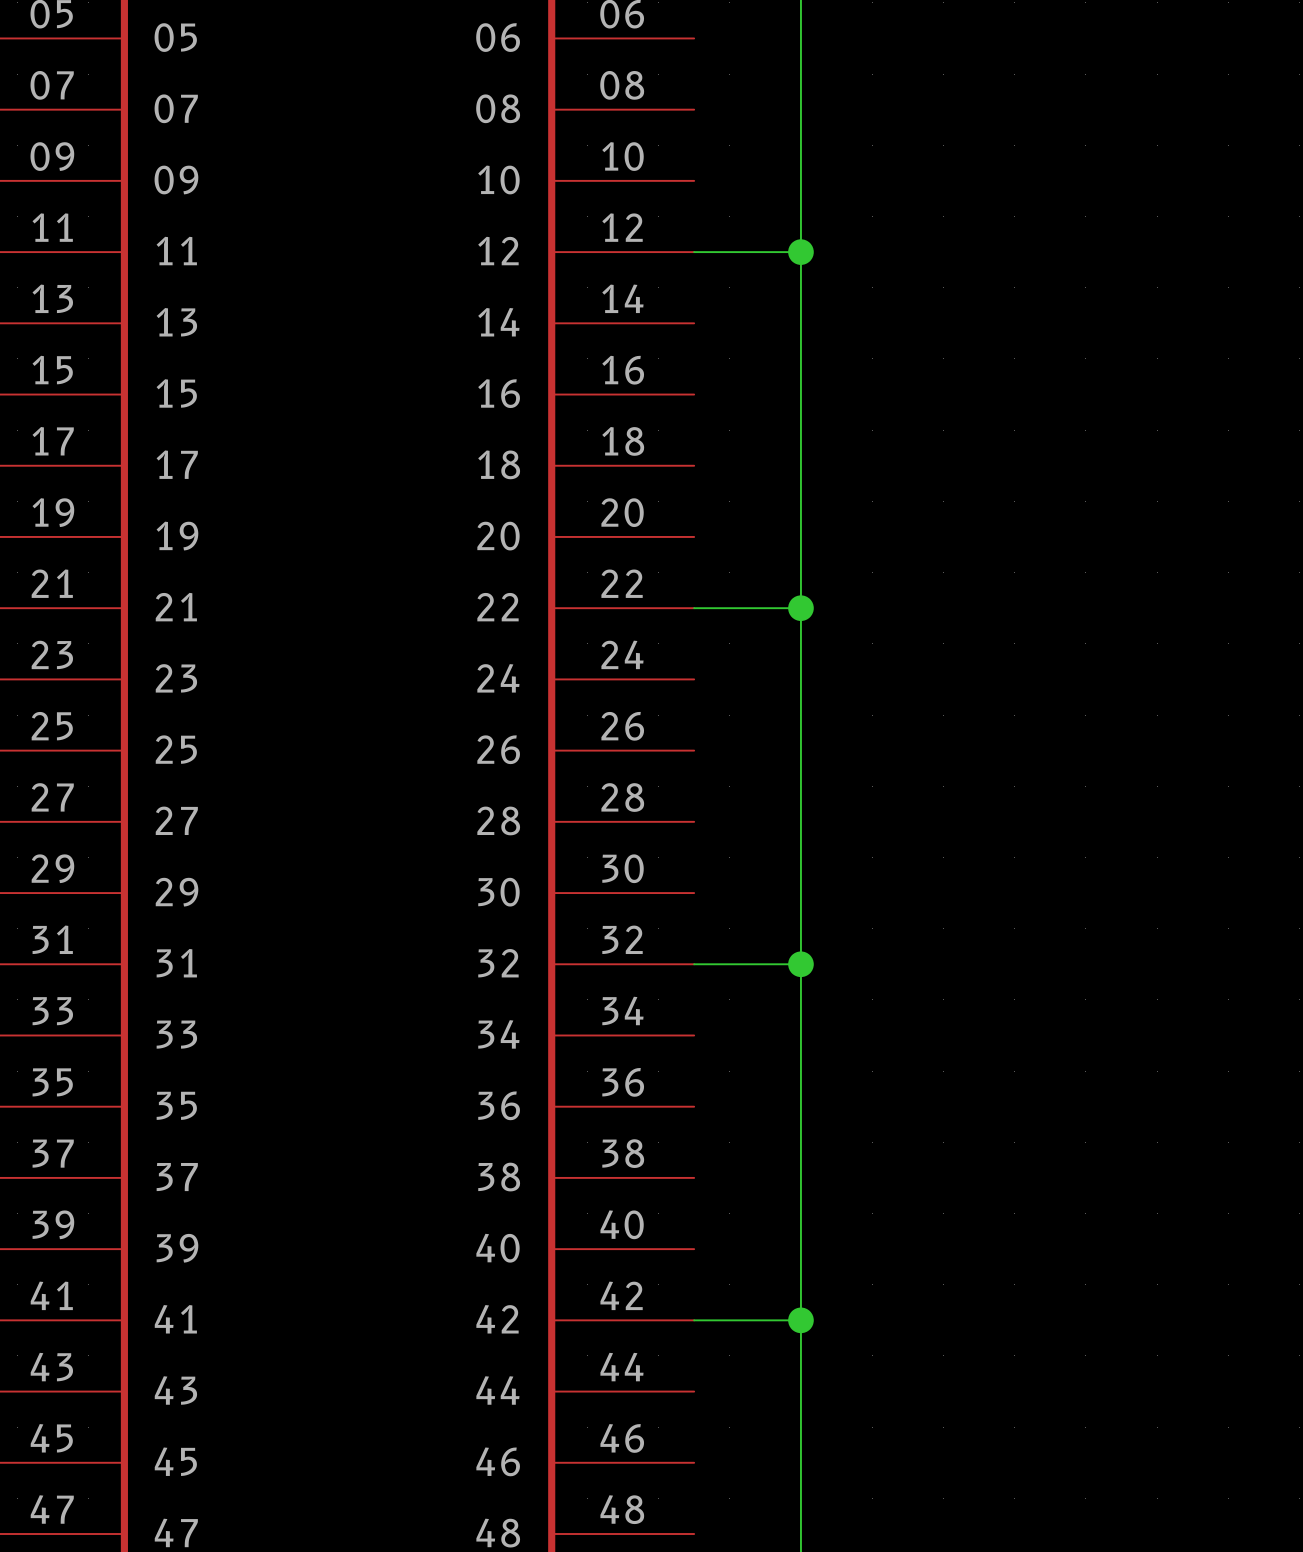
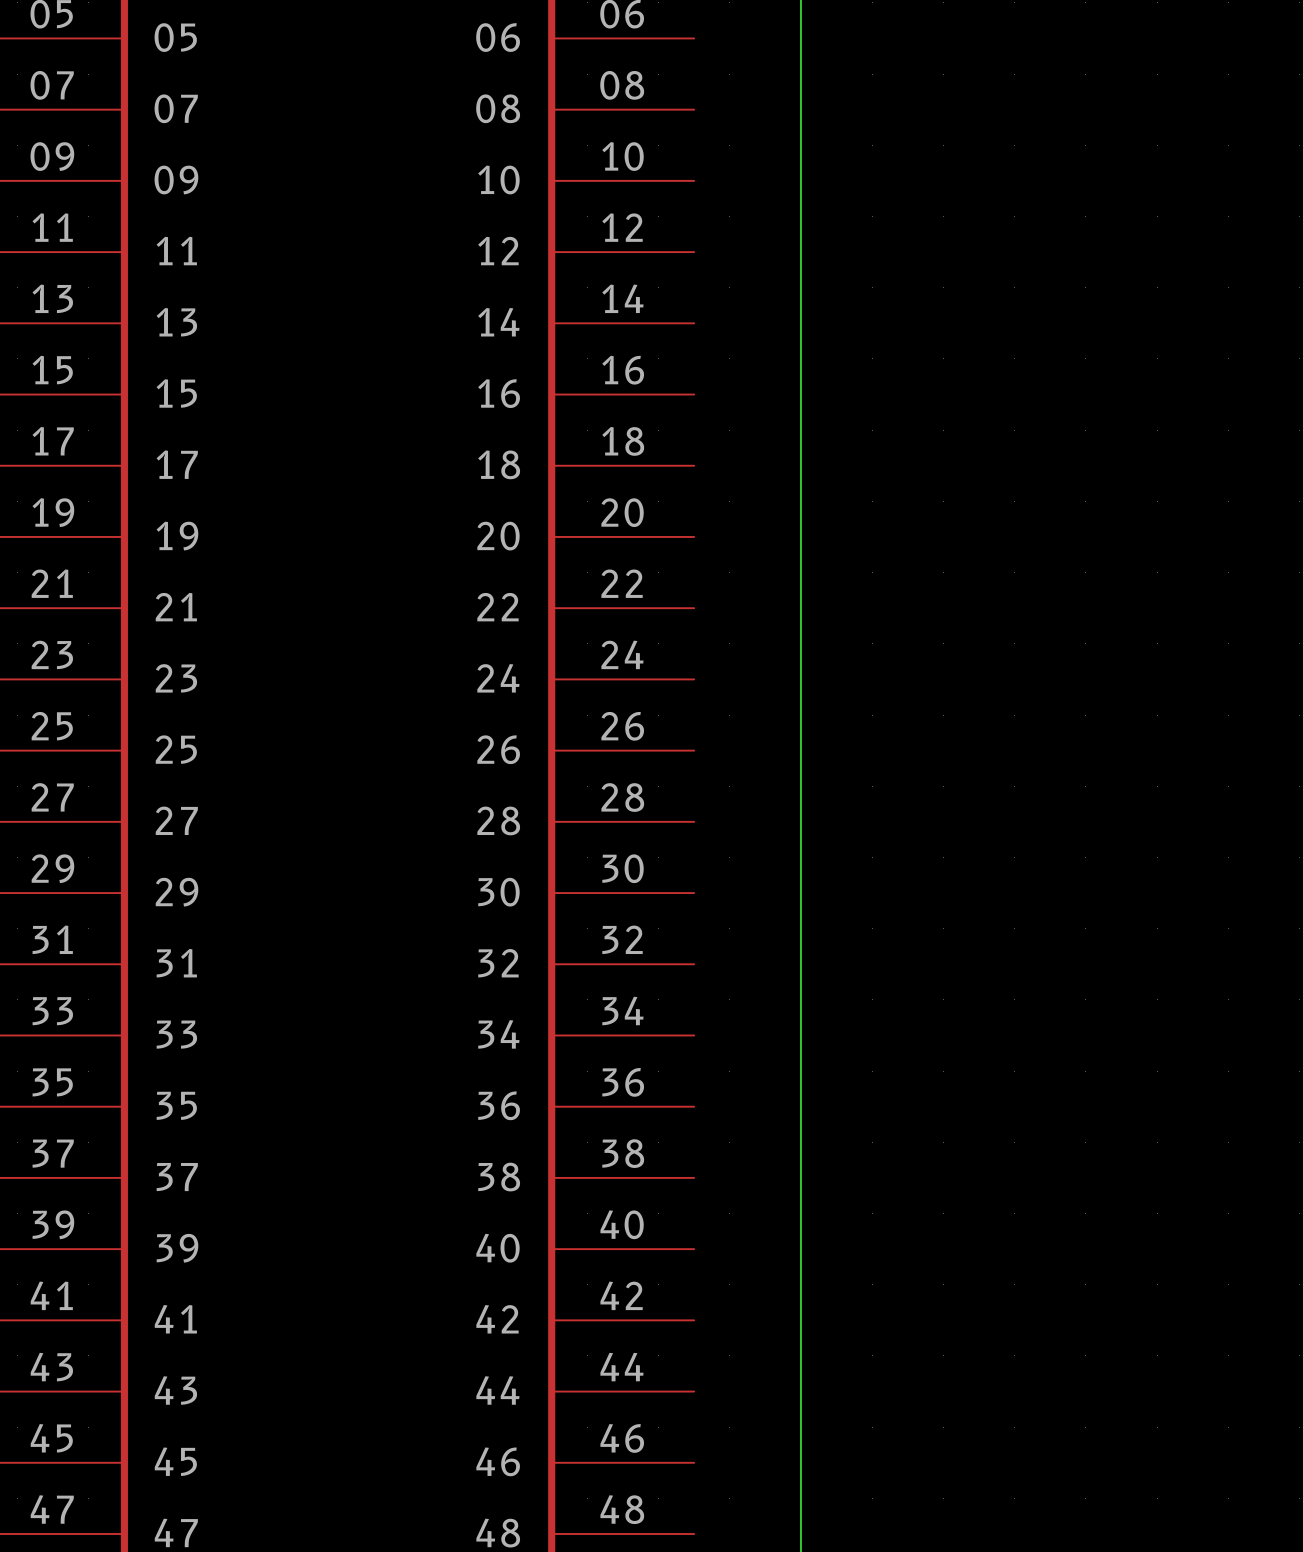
wire: (694, 252) (800, 252) -> none
junction: (800, 252) -> none
wire: (694, 608) (800, 608) -> none
junction: (800, 608) -> none
wire: (694, 964) (800, 964) -> none
junction: (800, 964) -> none
wire: (694, 1320) (800, 1320) -> none
junction: (800, 1320) -> none

